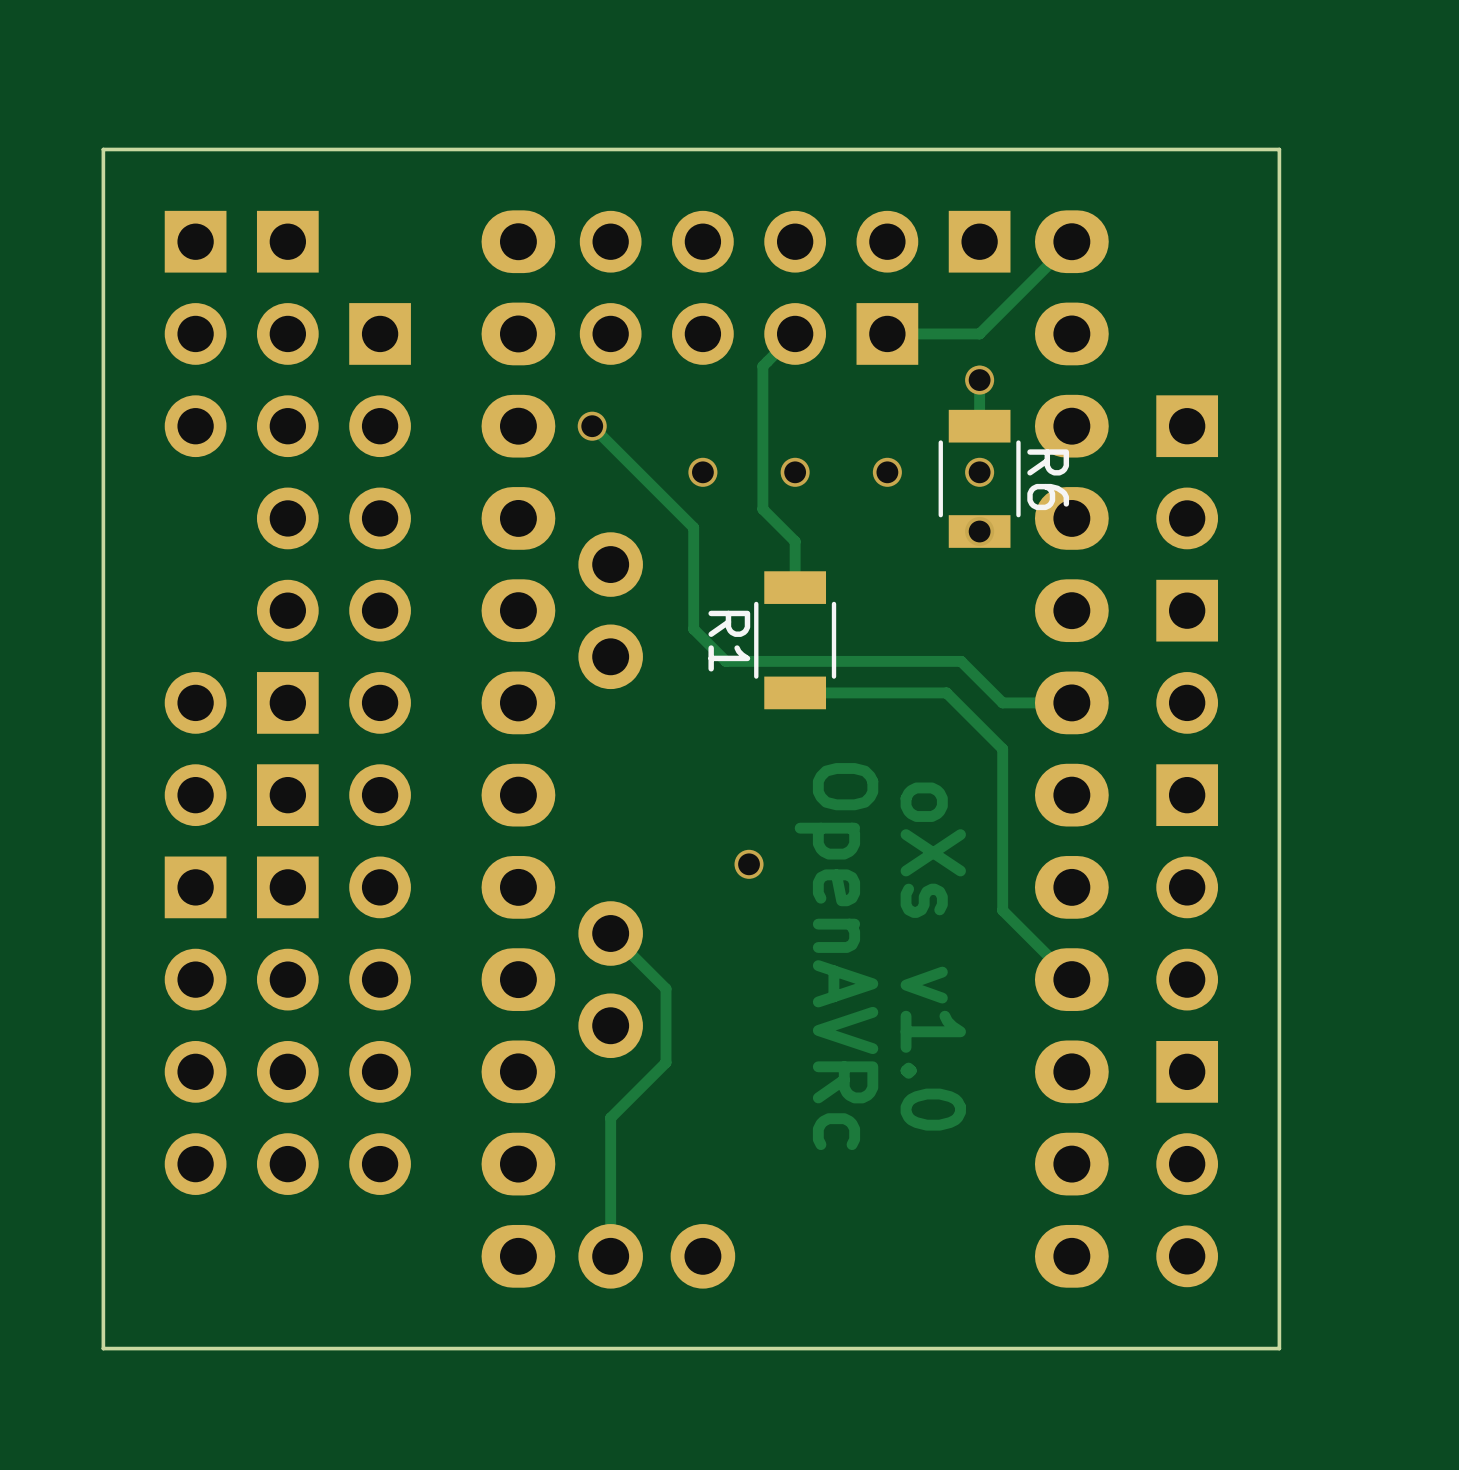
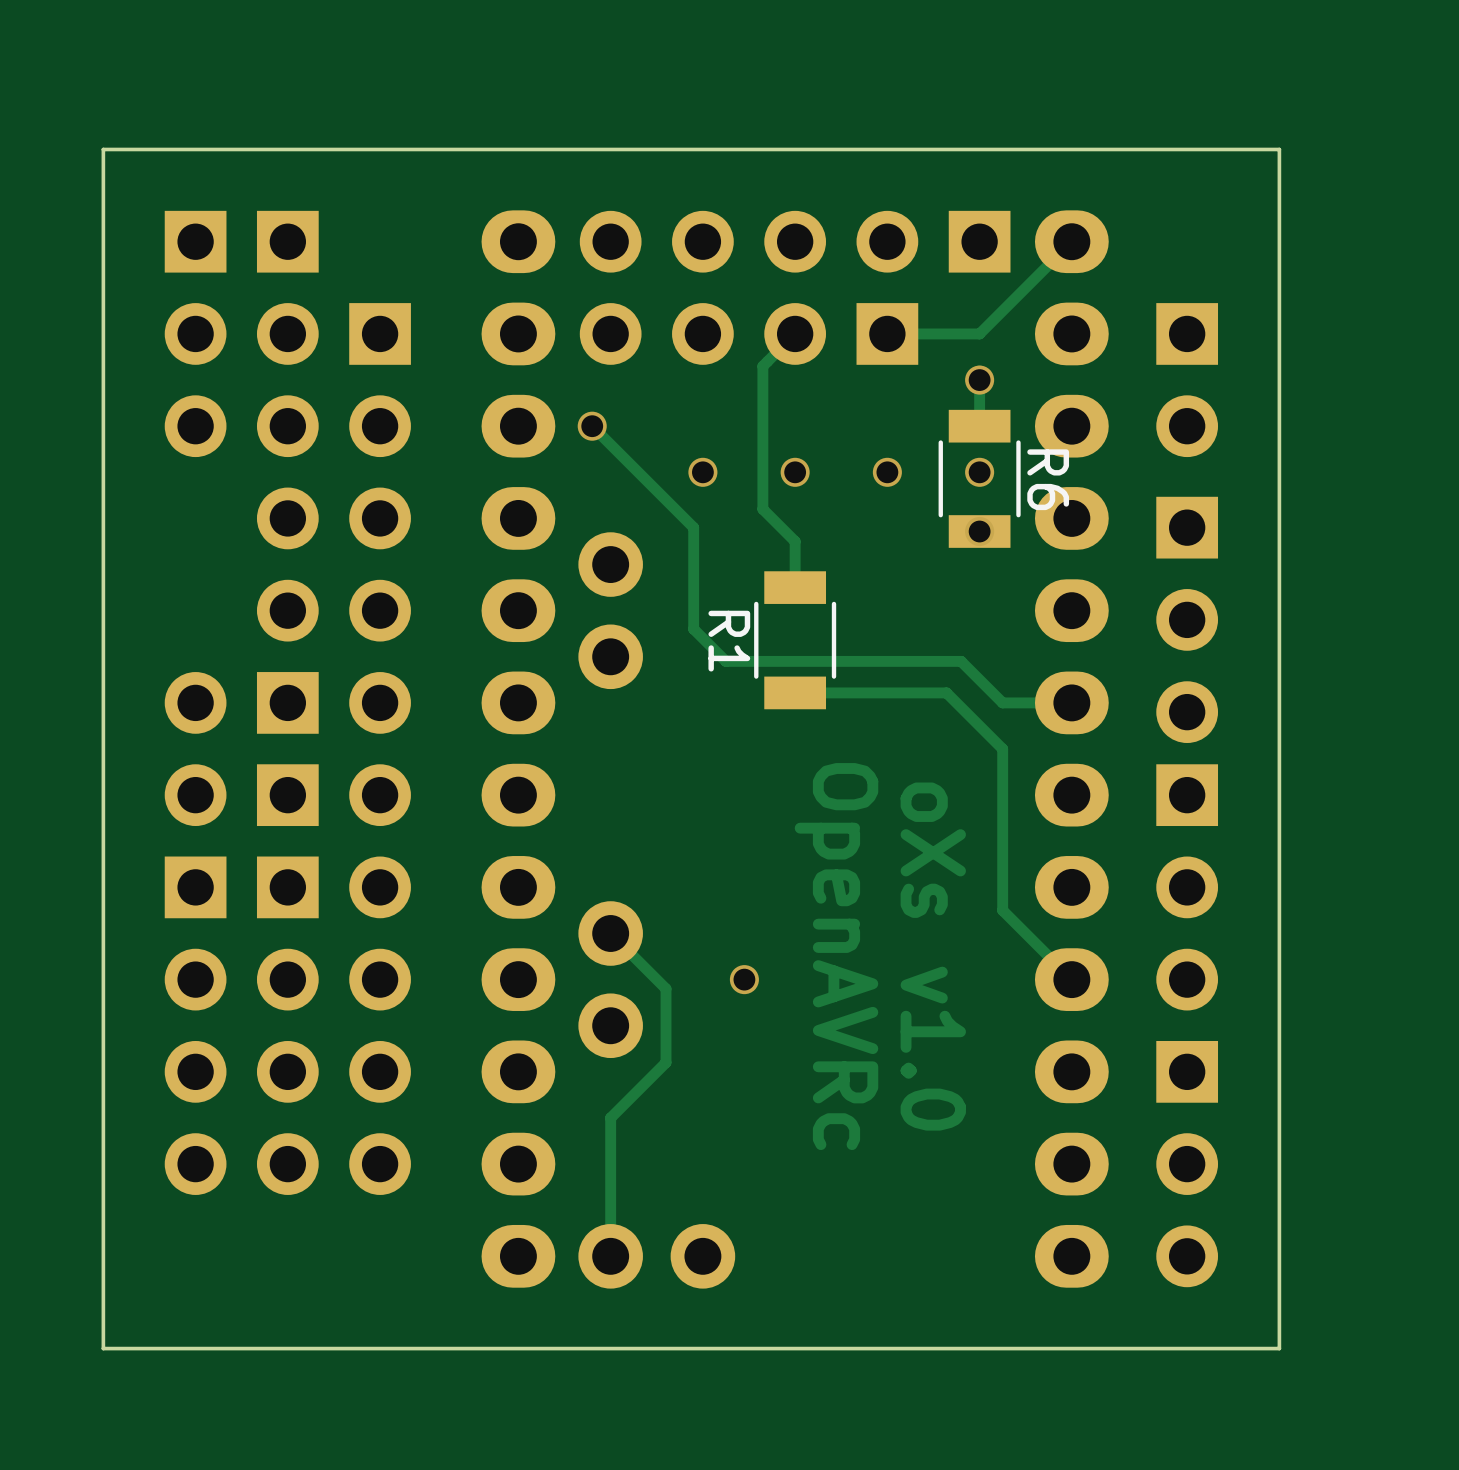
part position: (1187, 472) -> (1187, 380)
part: none -> (1187, 619)
part: (1187, 656) -> none
via position: (749, 864) -> (744, 979)

